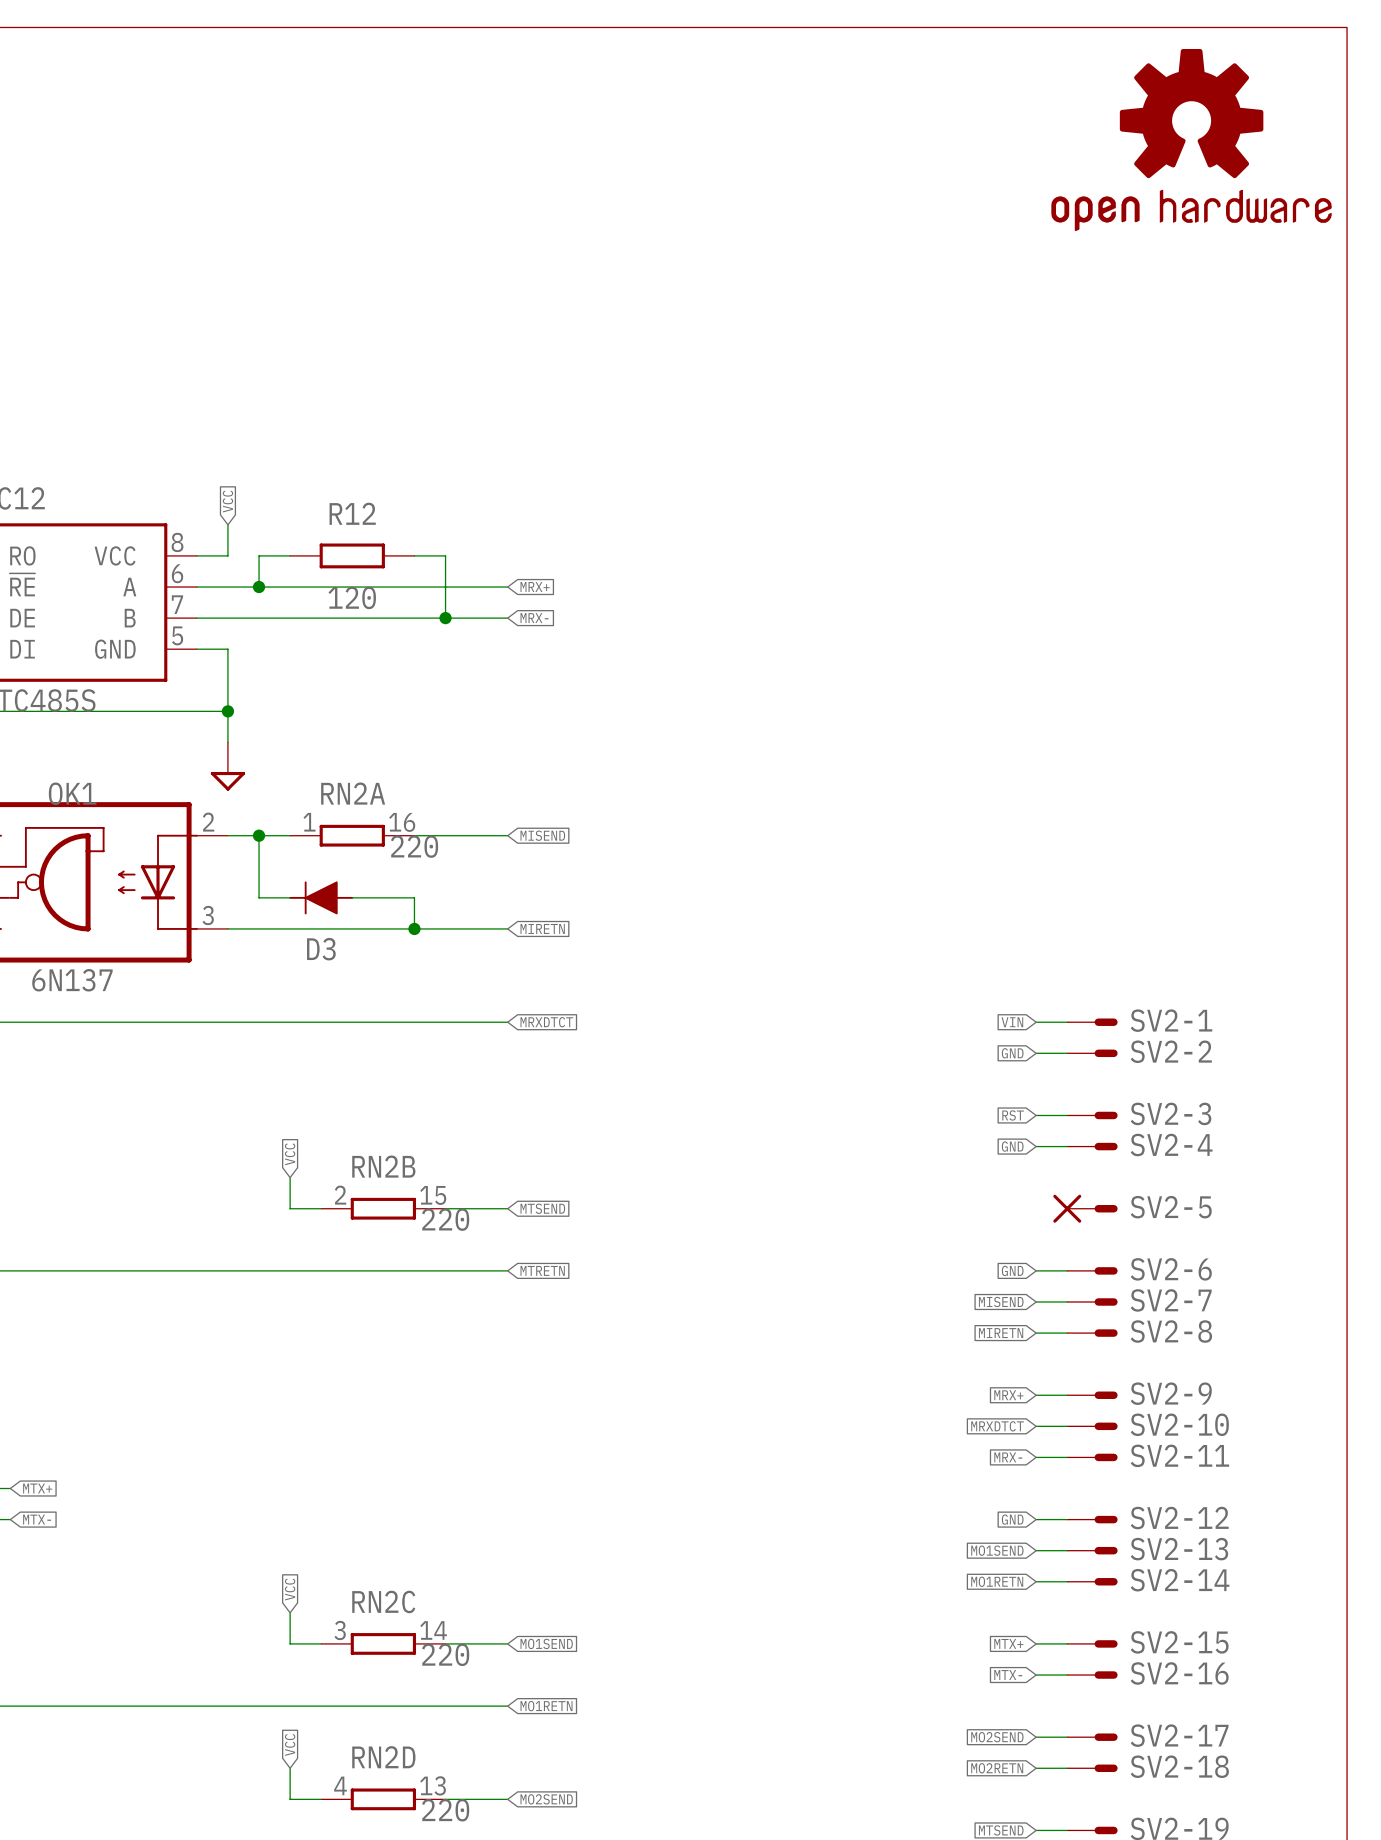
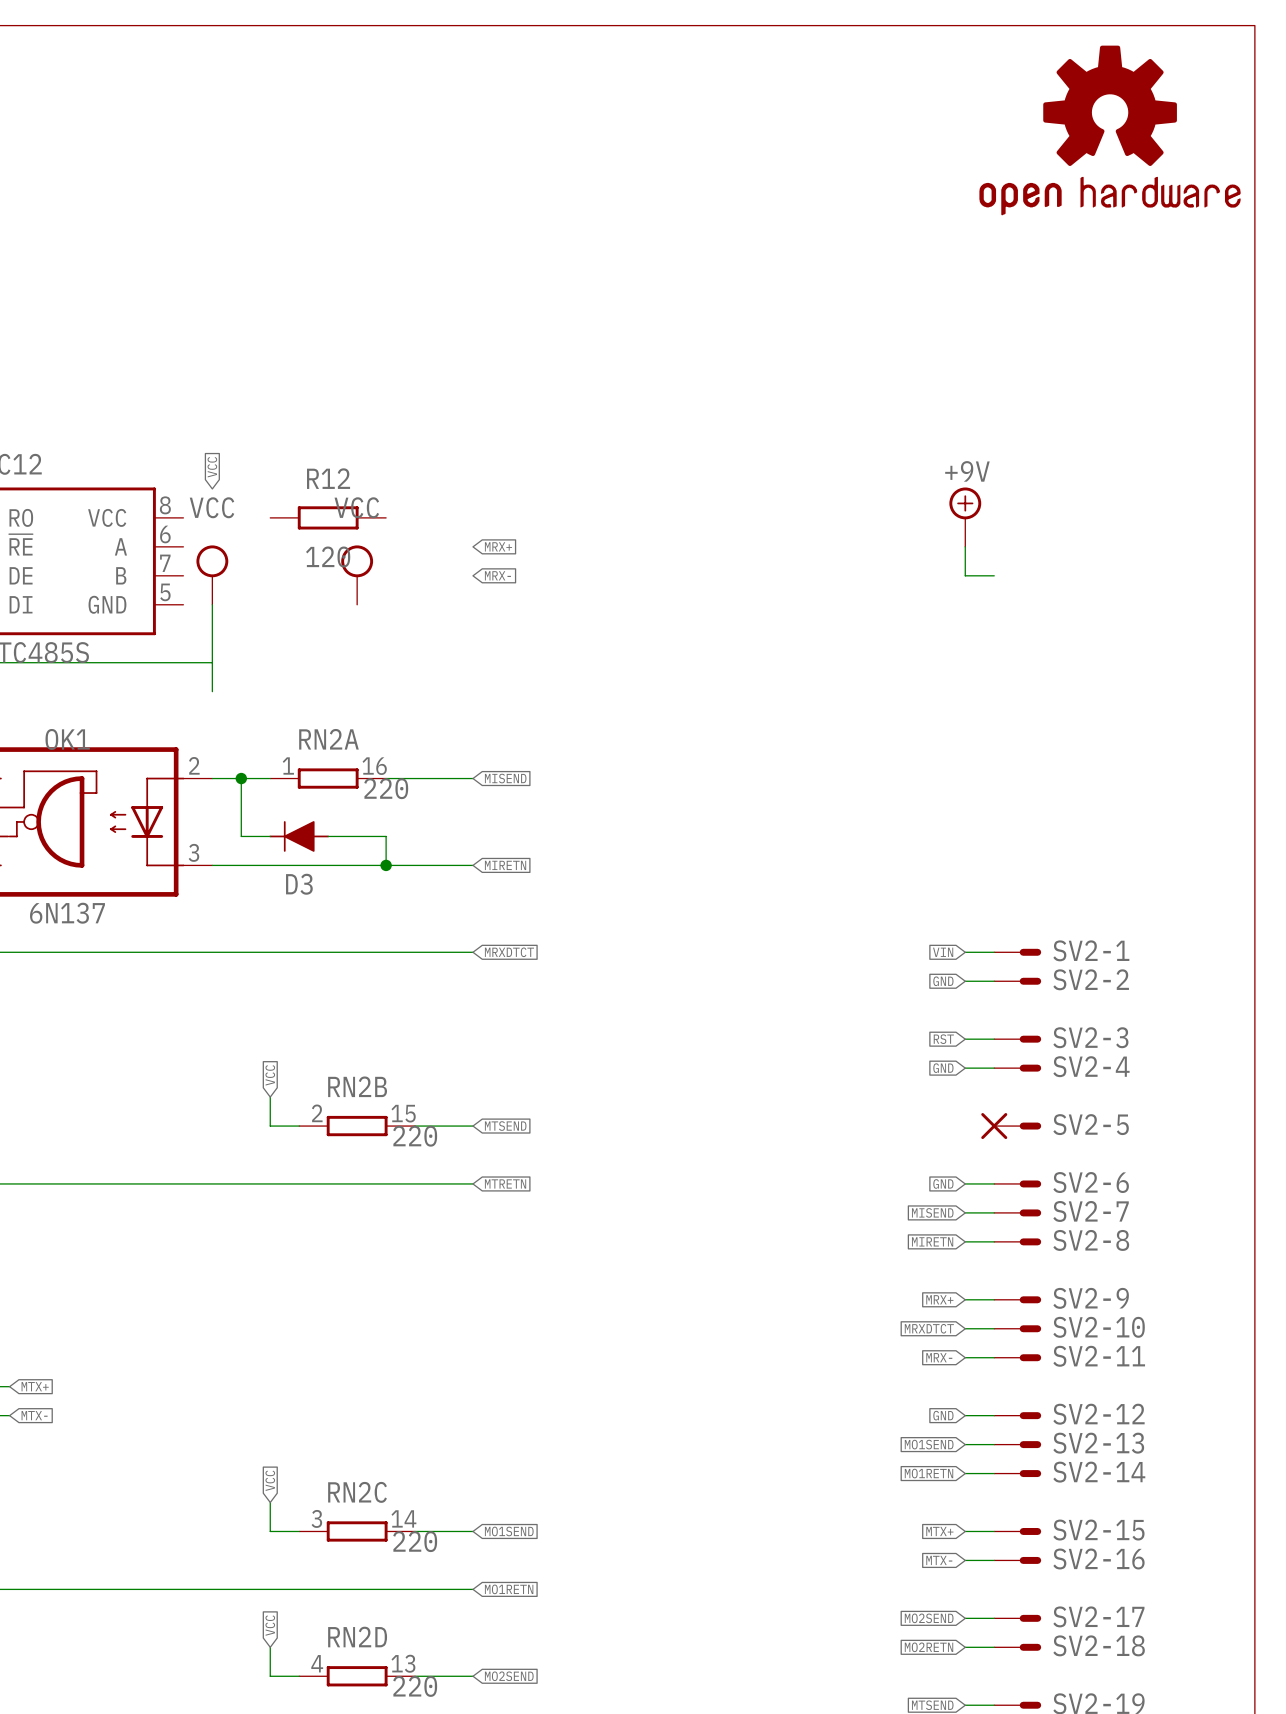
wire: (227, 524) (227, 555) (196, 555) -> none
wire: (290, 555) (259, 555) (259, 587) -> none
wire: (414, 555) (445, 555) (445, 618) -> none
power symbol: none -> +9V (965, 517)
wire: (196, 587) (507, 587) -> none
junction: (259, 587) -> none
wire: none -> (965, 546) (965, 575) (994, 575)
power symbol: none -> VCC (212, 575)
power symbol: none -> VCC (357, 575)
wire: (196, 618) (507, 618) -> none
junction: (445, 618) -> none
wire: (196, 649) (227, 649) -> none
junction: (227, 711) -> none
power symbol: (227, 766) -> none

